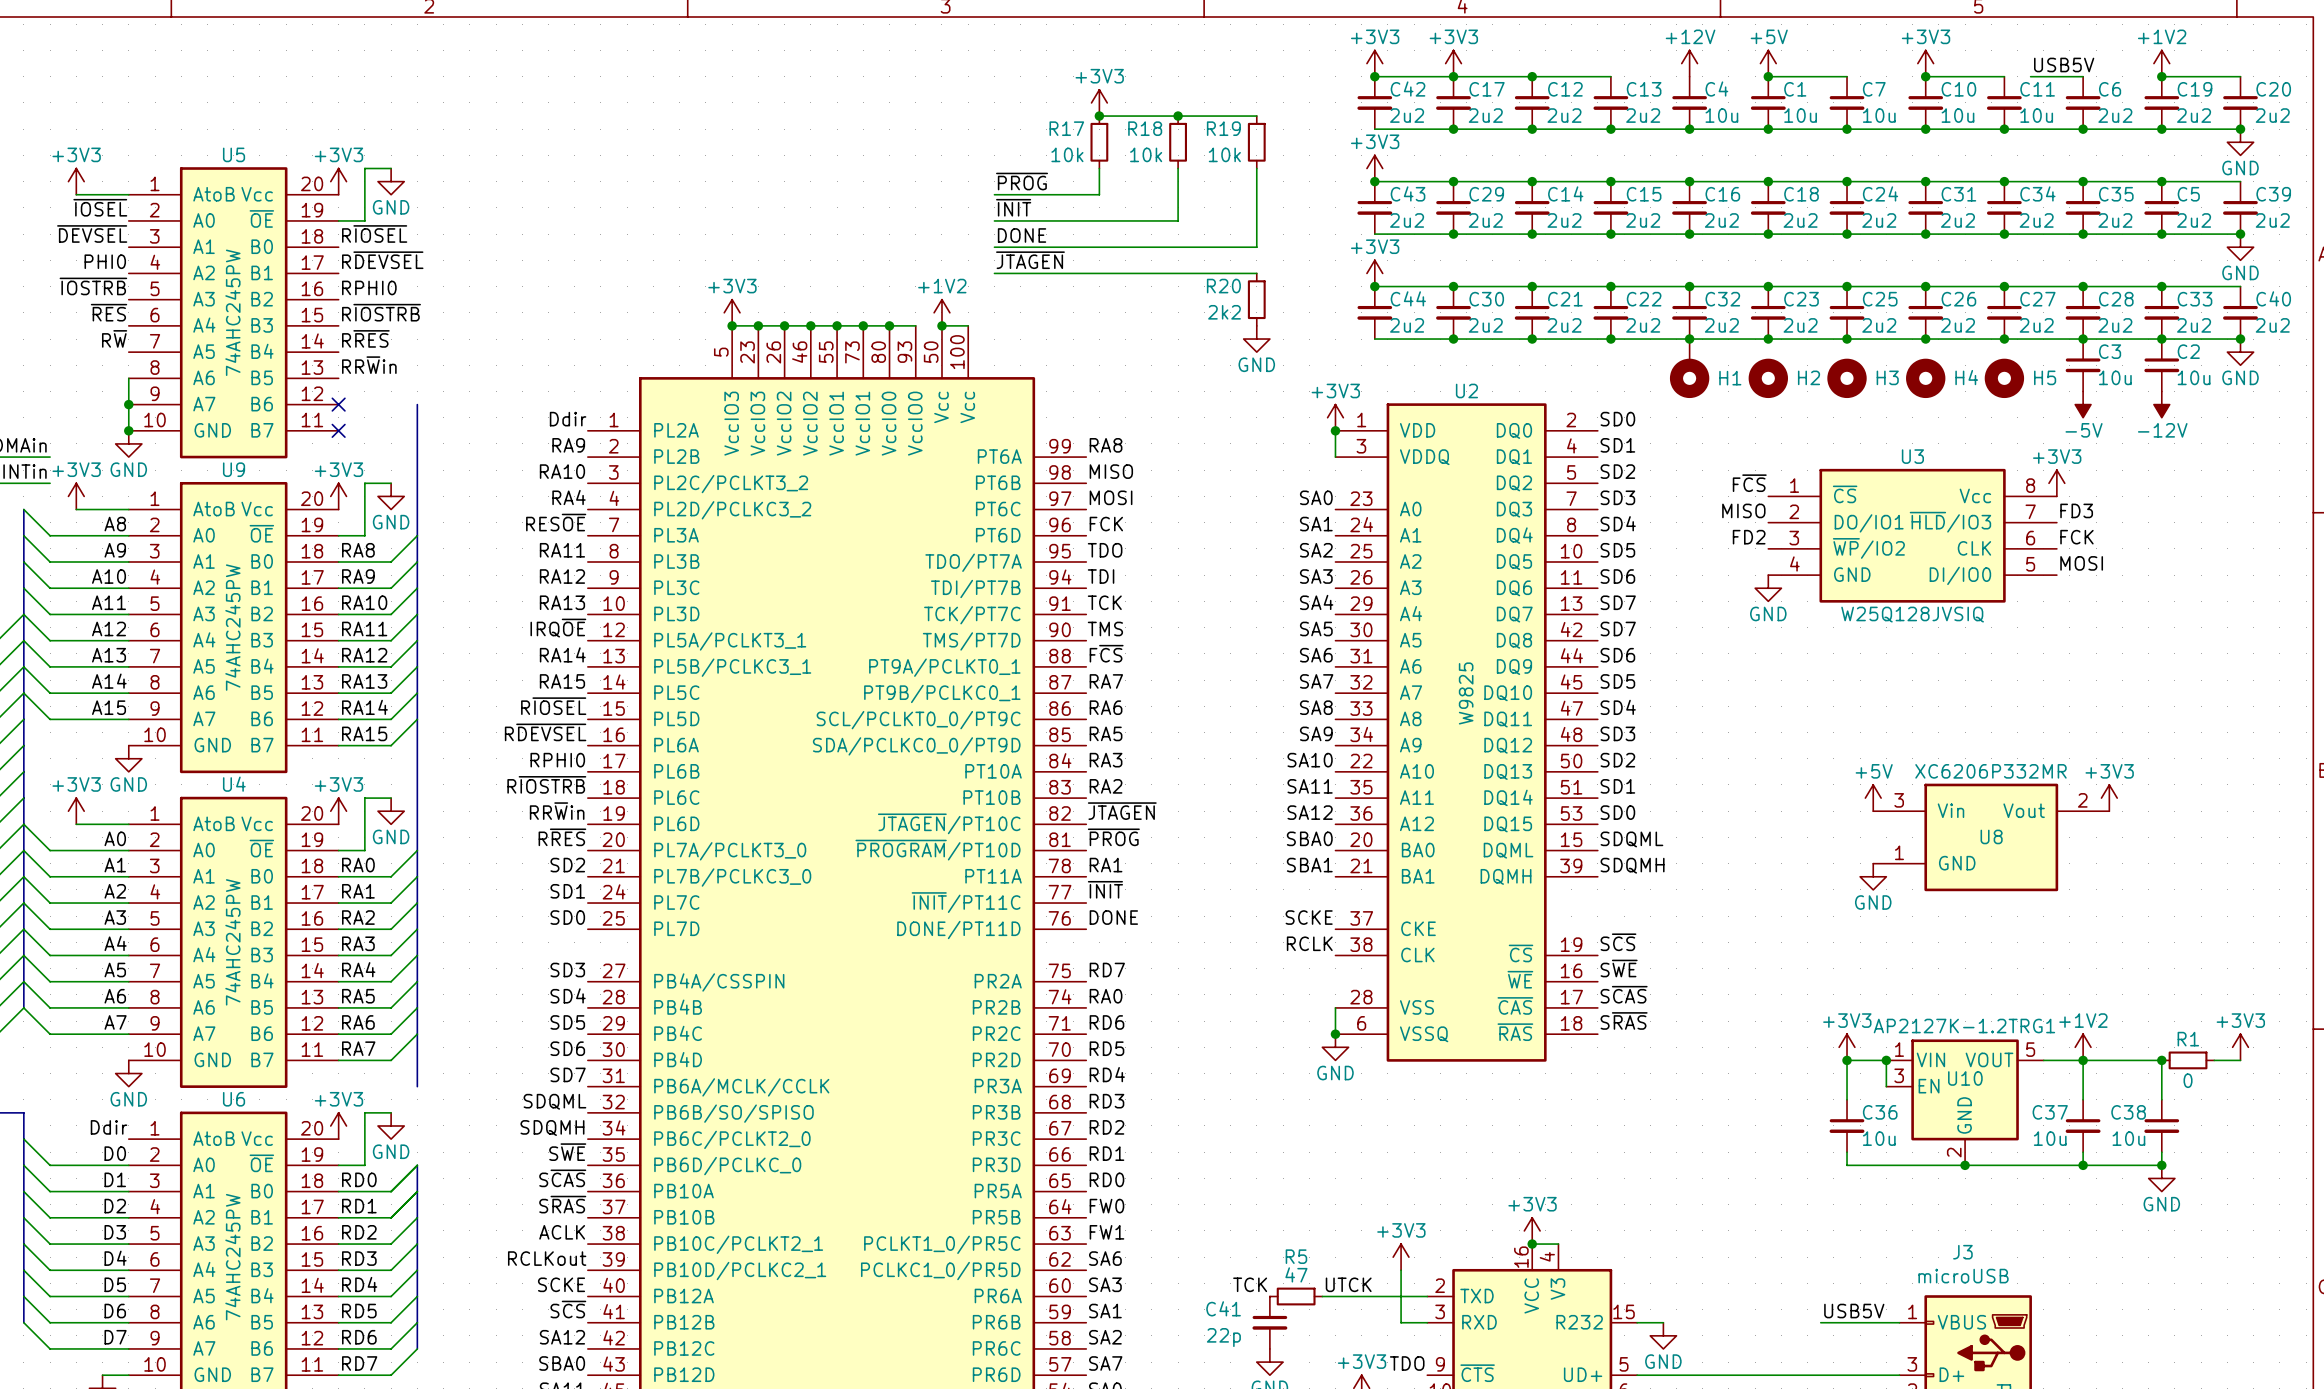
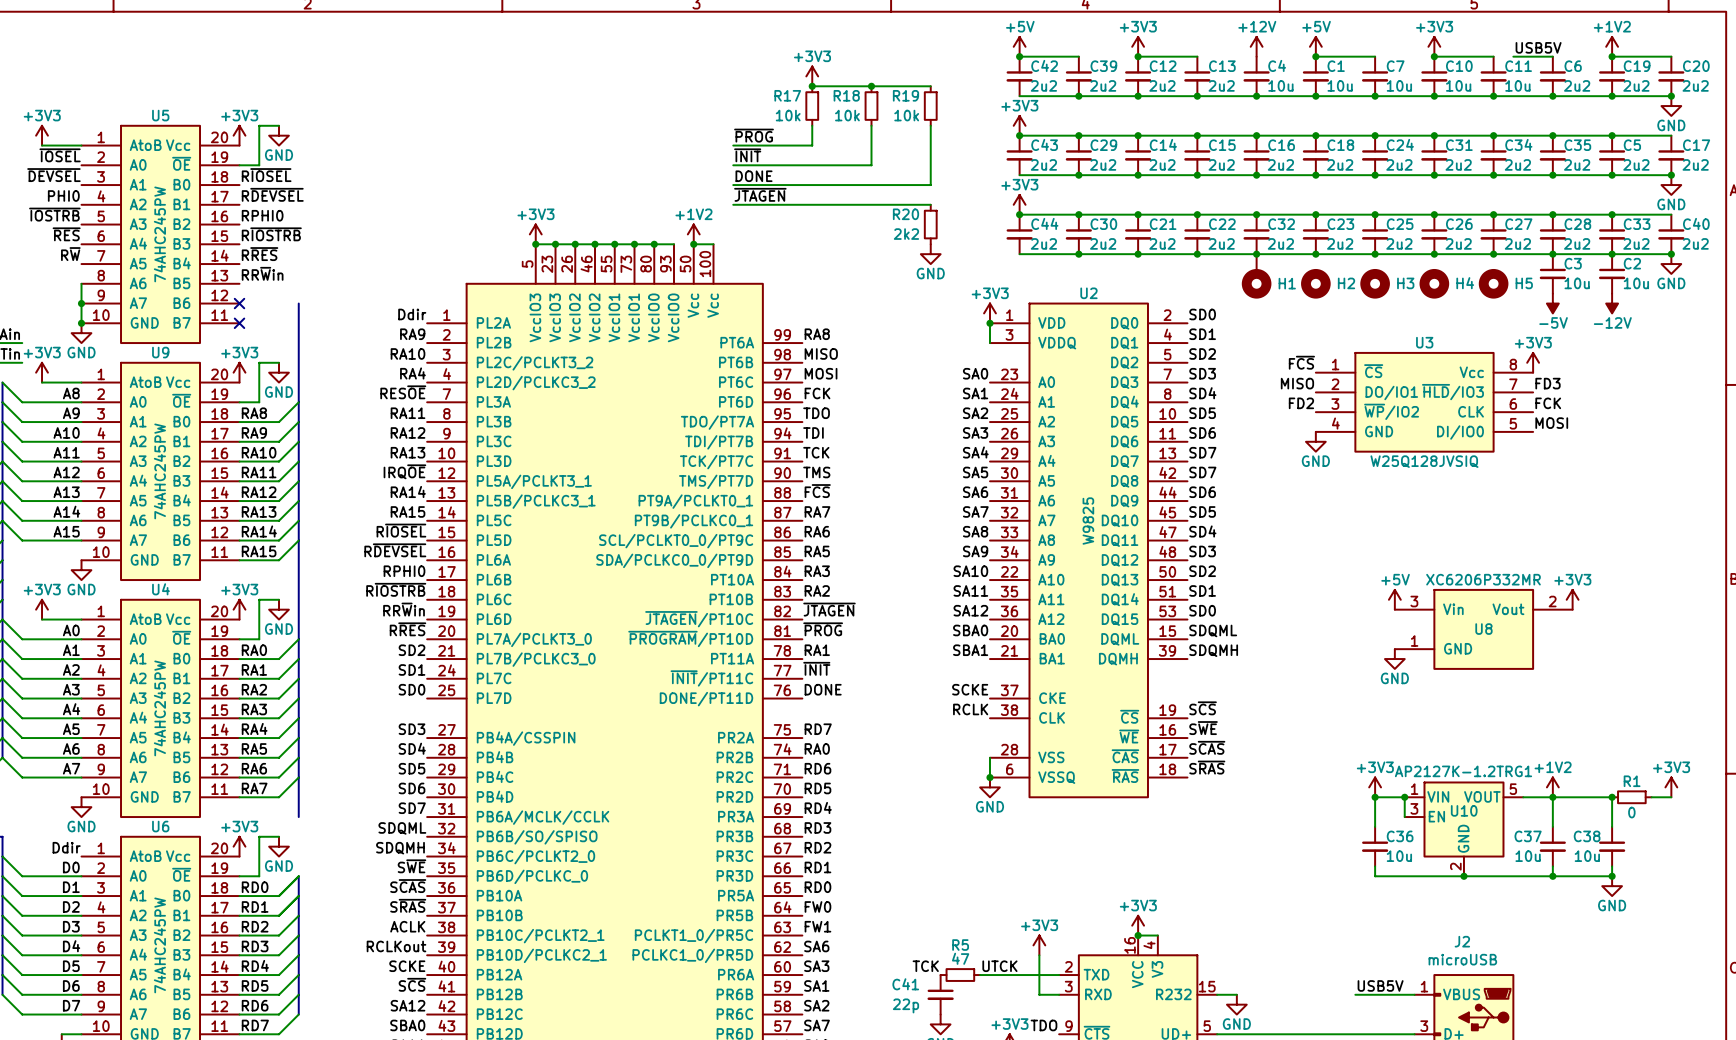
power symbol: +3V3 (1374, 63) -> +5V (1019, 46)
power symbol position: +3V3 (1453, 63) -> +3V3 (1138, 46)
wire: (1453, 76) (1532, 76) -> none
junction: (1453, 76) -> none
C17 name: C17 (1487, 89) -> C39 (1103, 66)
C39 name: C39 (2273, 194) -> C17 (1696, 145)
J3 name: J3 (1962, 1252) -> J2 (1462, 941)

